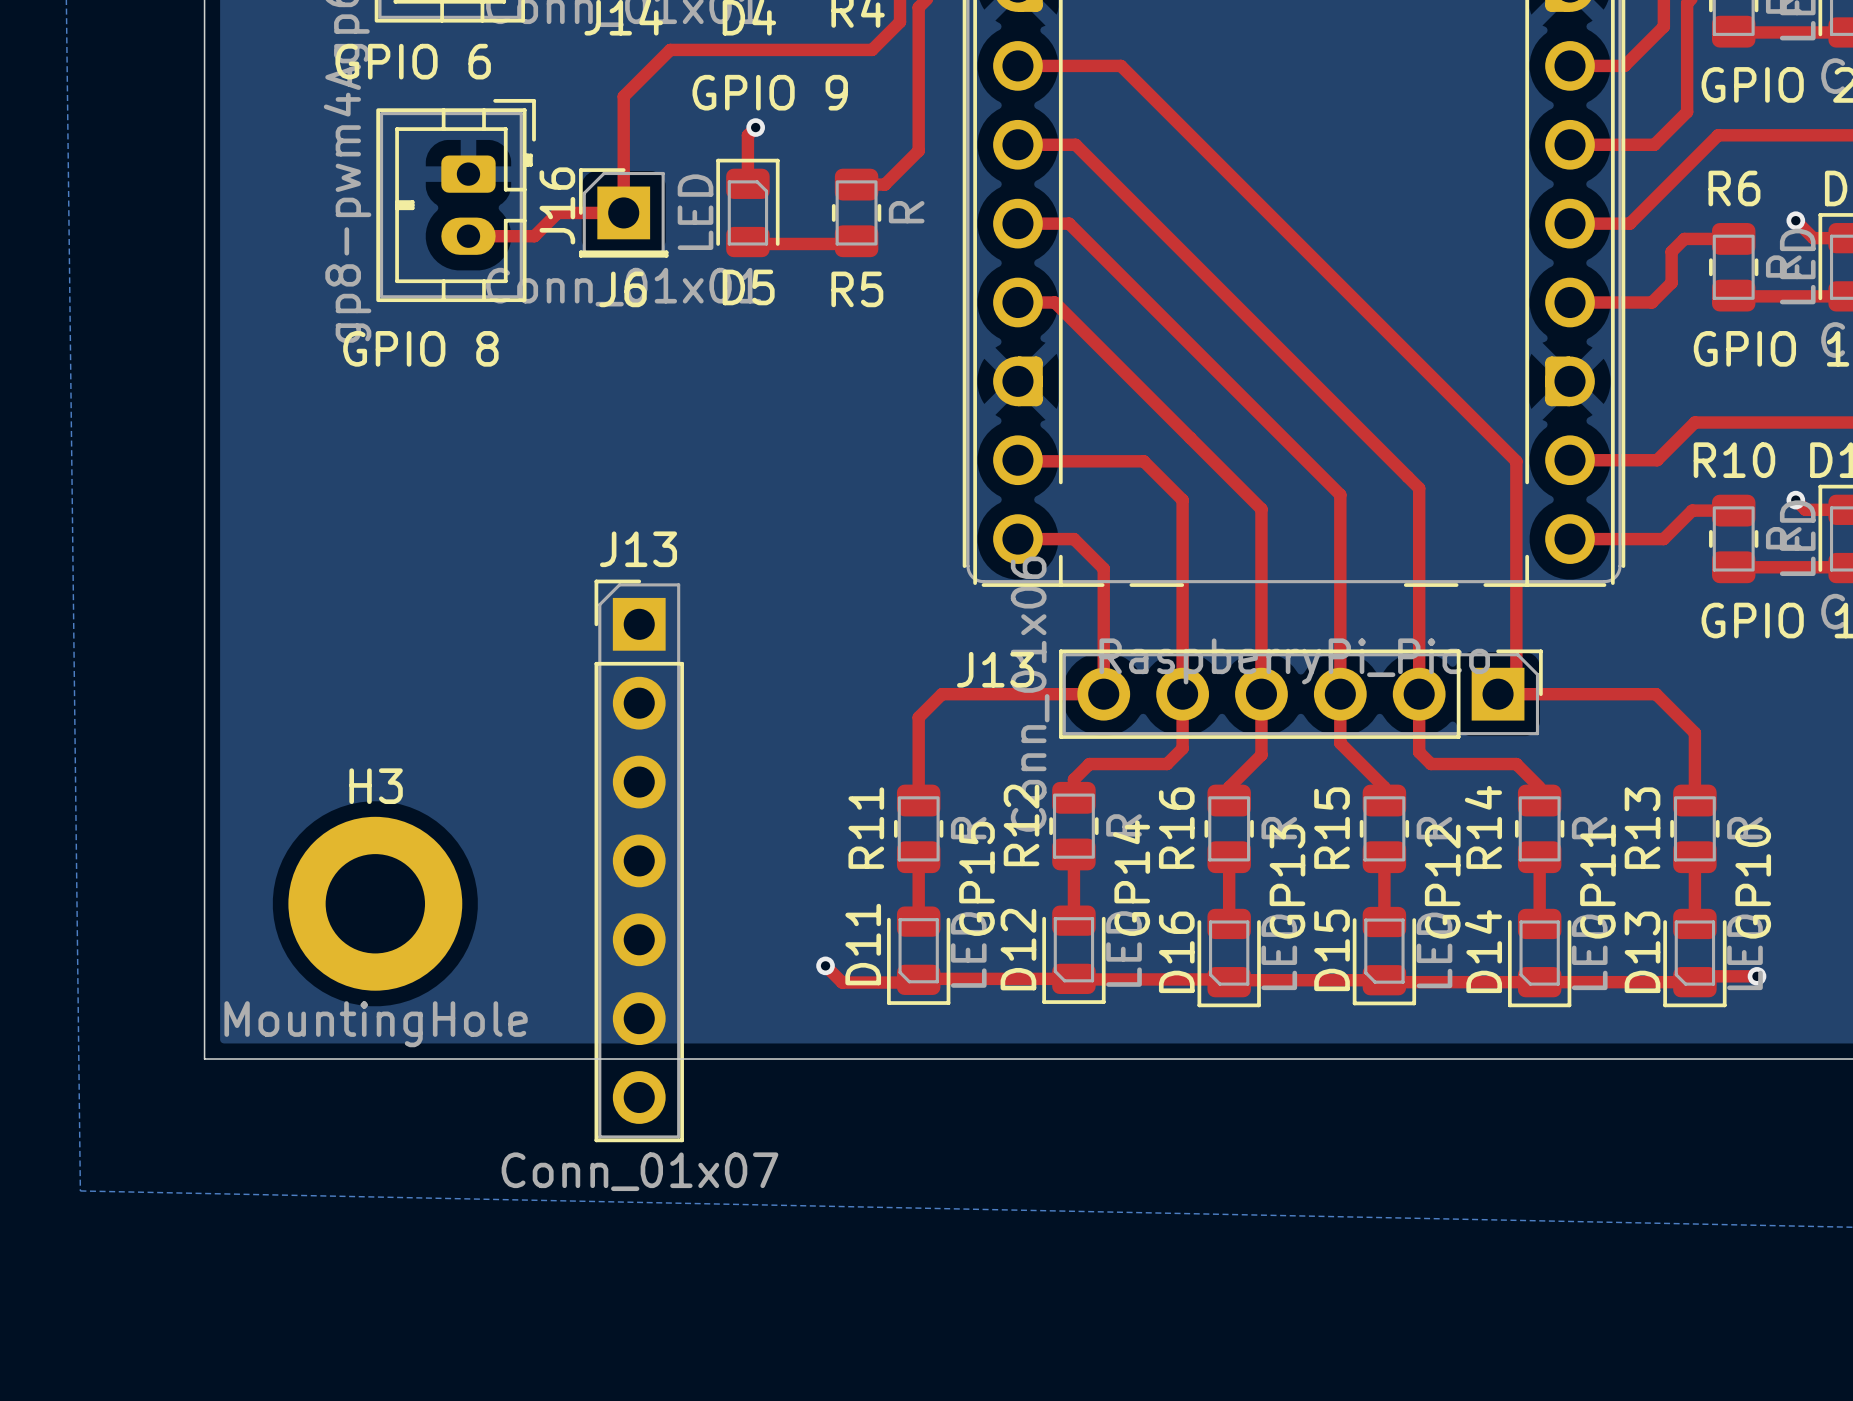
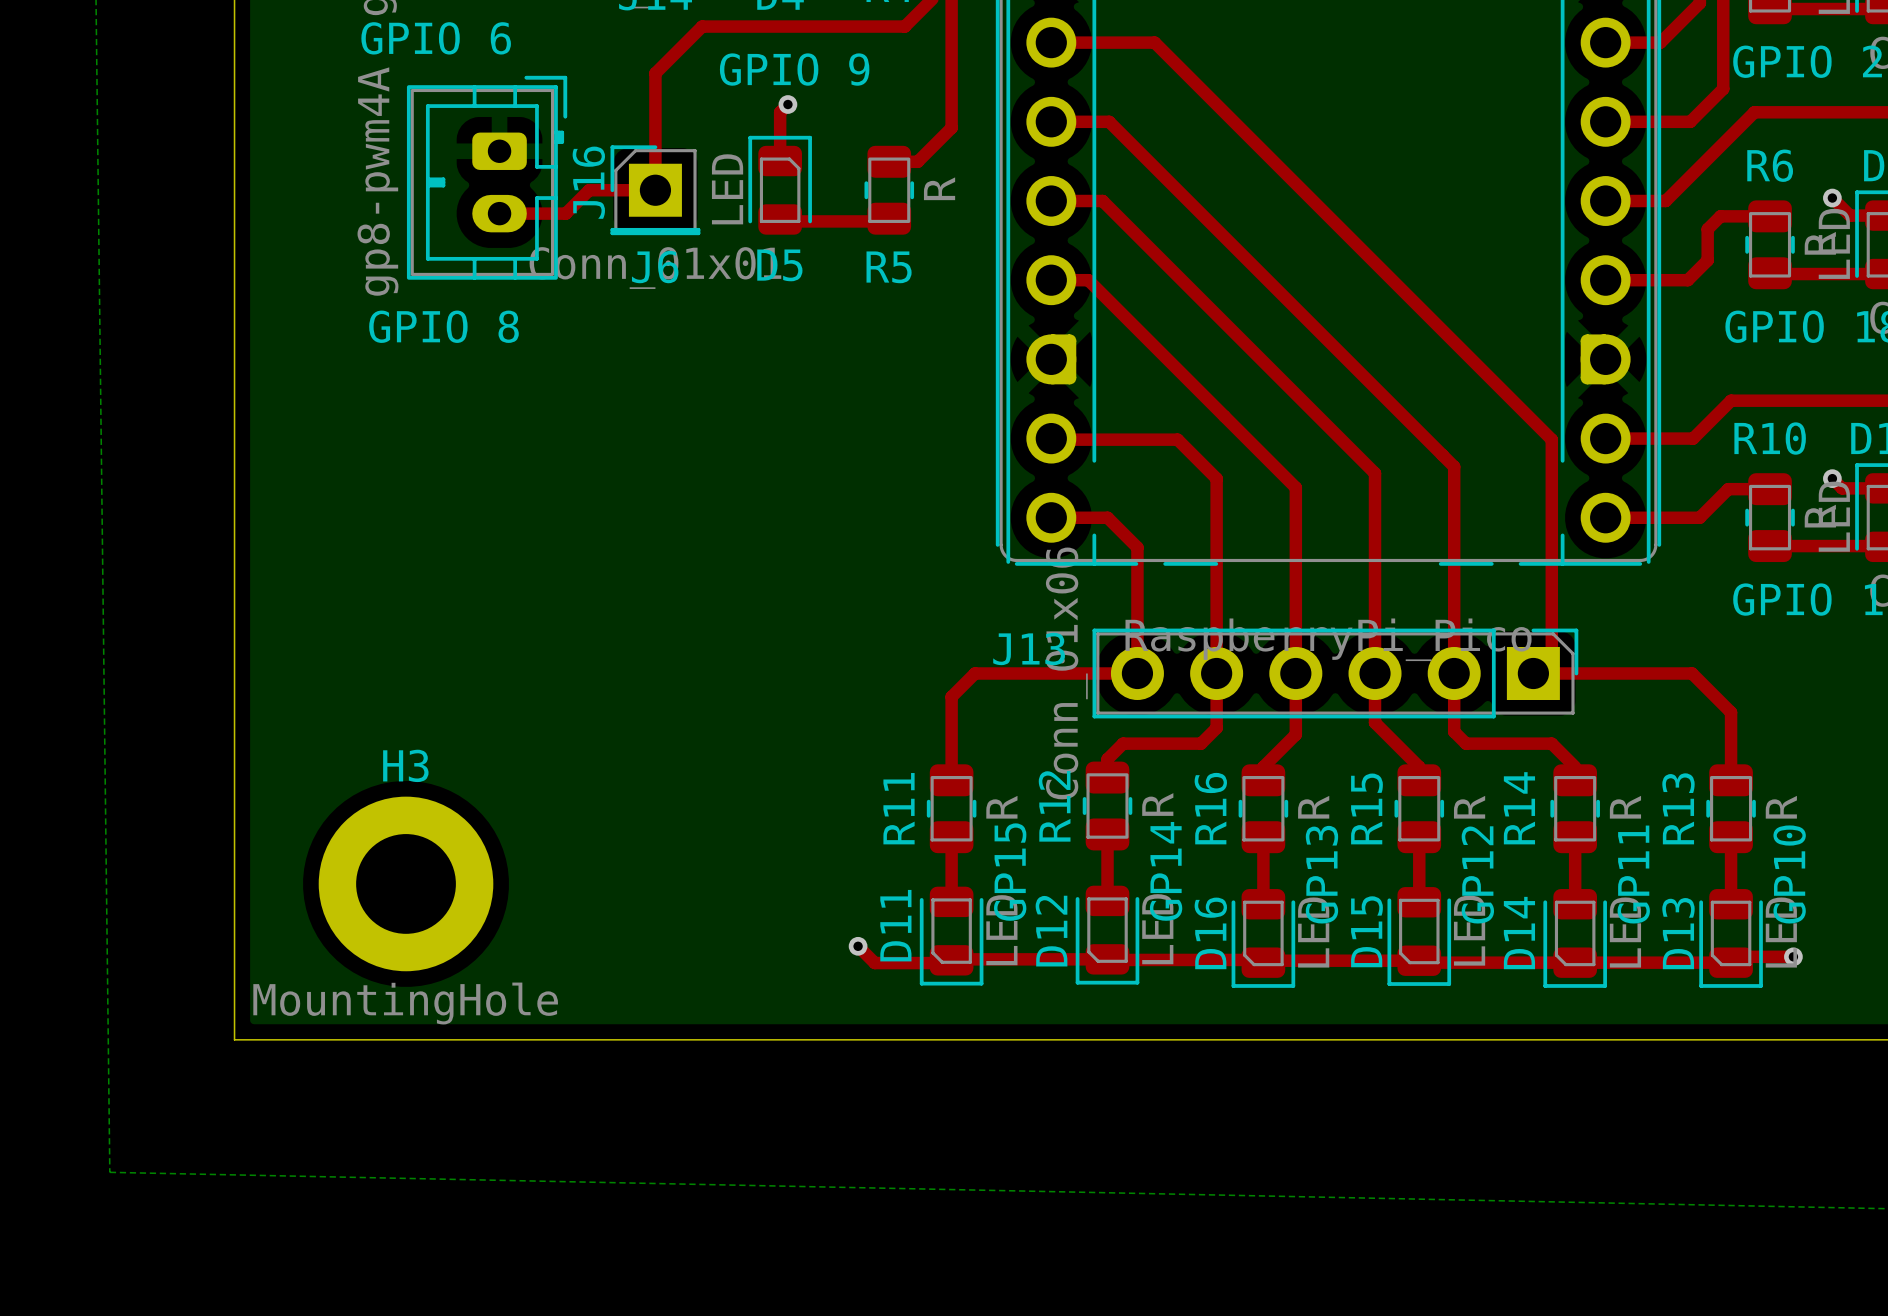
J13: Conn_01x07 (639, 860) -> none

